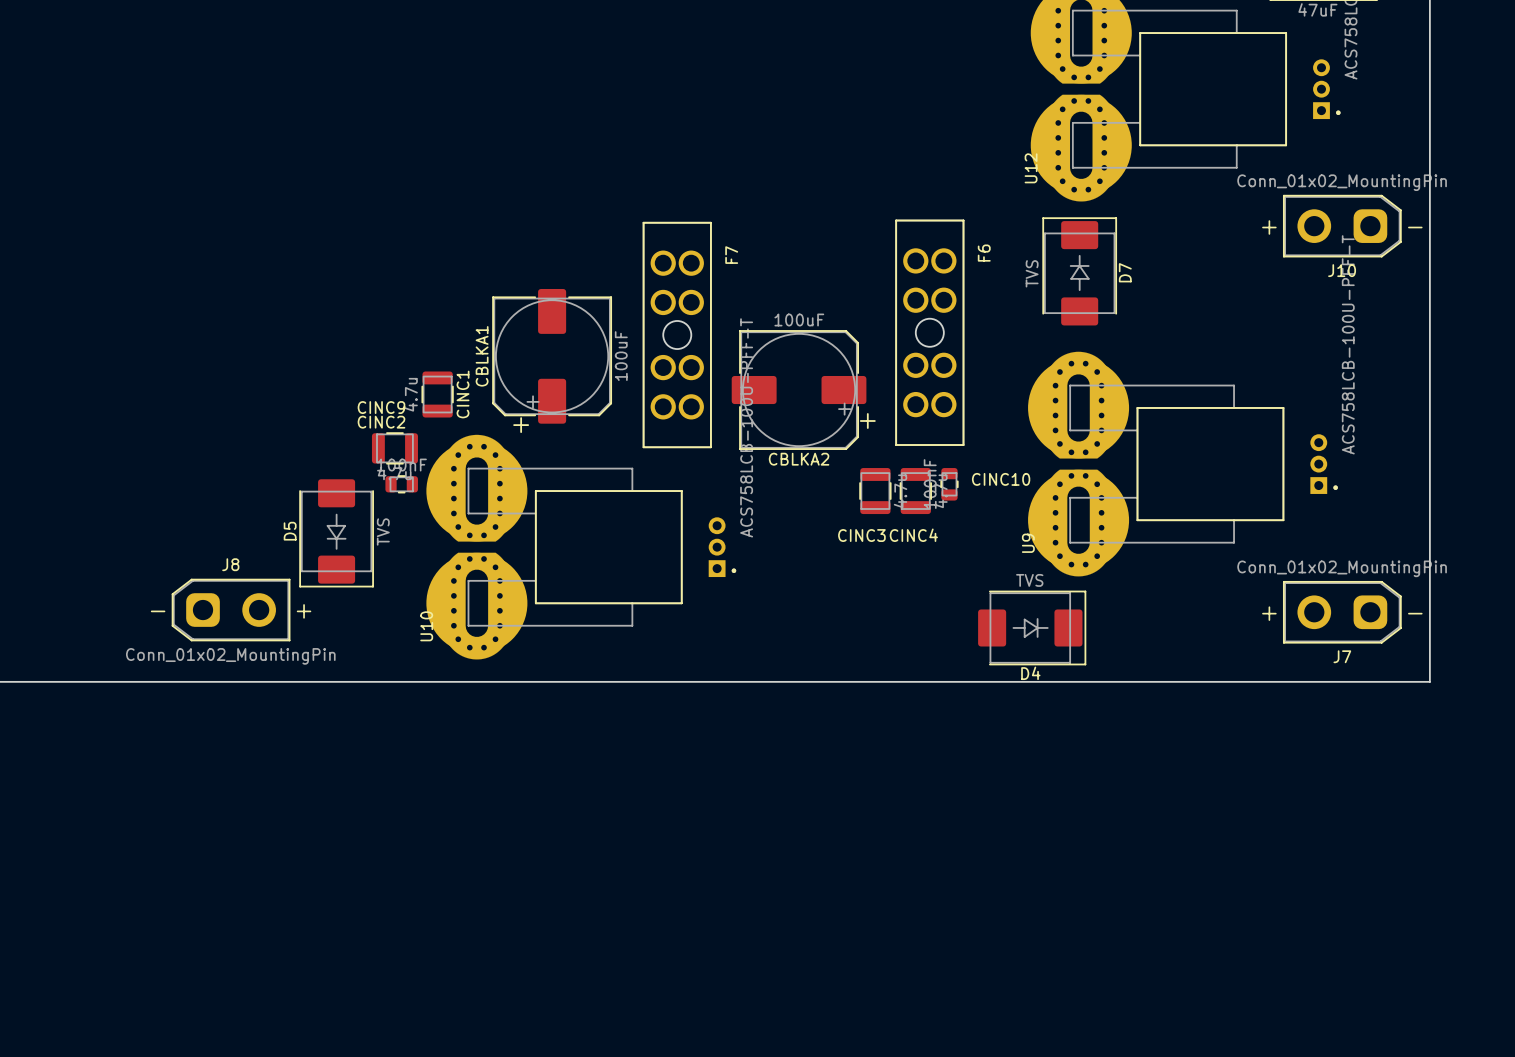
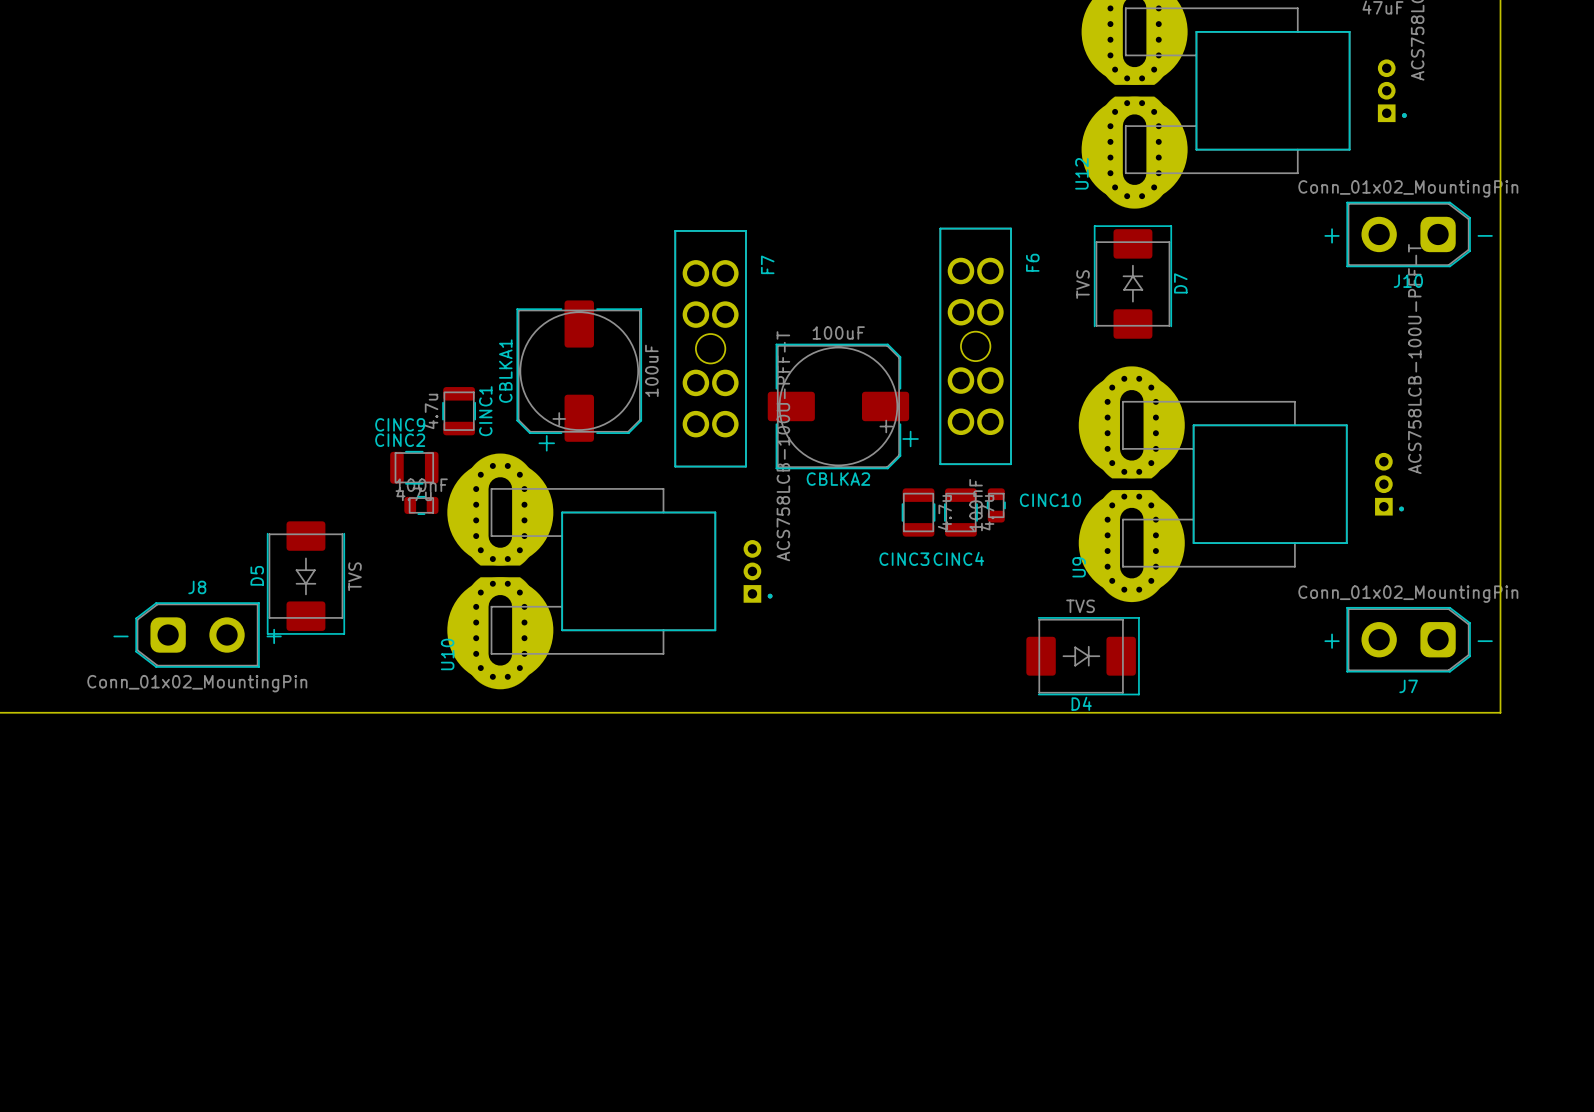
D5 position: (336, 533) -> (305, 577)
J8 position: (231, 610) -> (197, 635)

